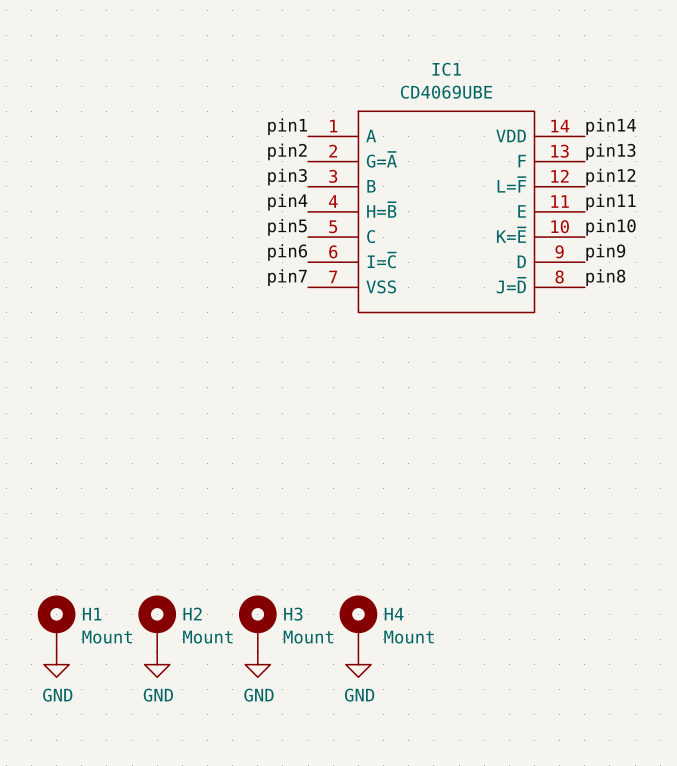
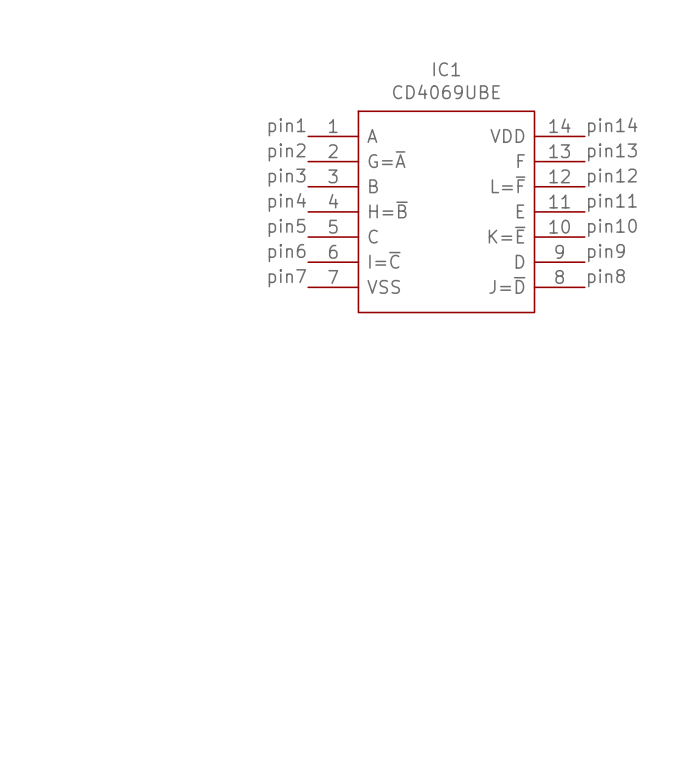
H1: Mount (56, 623) -> none
H2: Mount (157, 623) -> none
H3: Mount (257, 623) -> none
H4: Mount (358, 623) -> none
power symbol: GND (56, 664) -> none
power symbol: GND (157, 664) -> none
power symbol: GND (257, 664) -> none
power symbol: GND (358, 664) -> none

